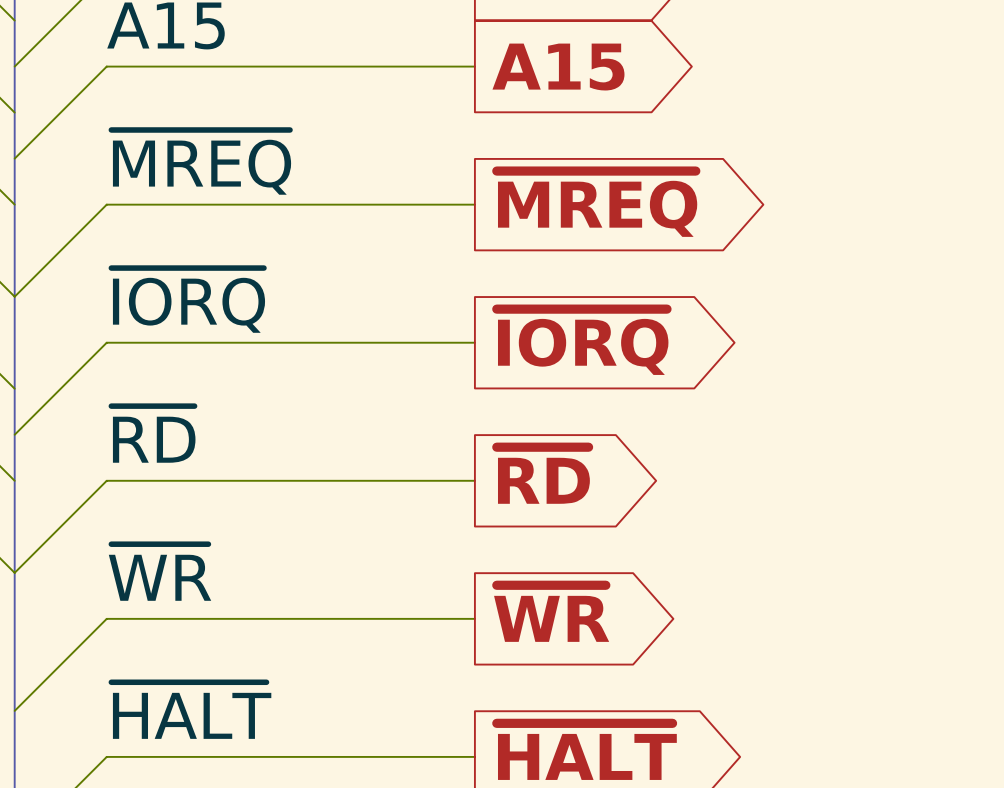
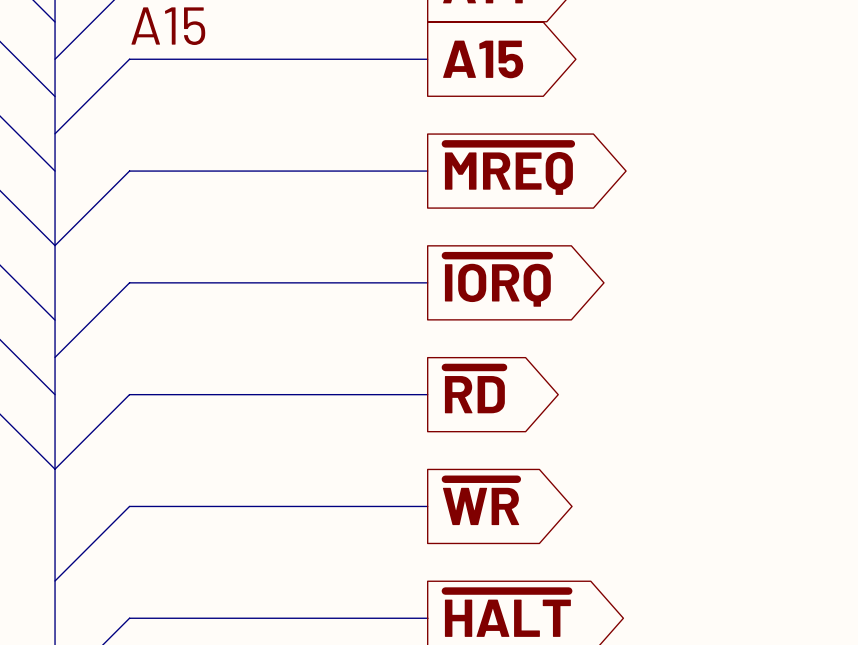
label: ~{MREQ} (201, 162) -> none
label: ~{IORQ} (188, 300) -> none
label: ~{RD} (153, 434) -> none
label: ~{WR} (160, 572) -> none
label: ~{HALT} (191, 710) -> none

